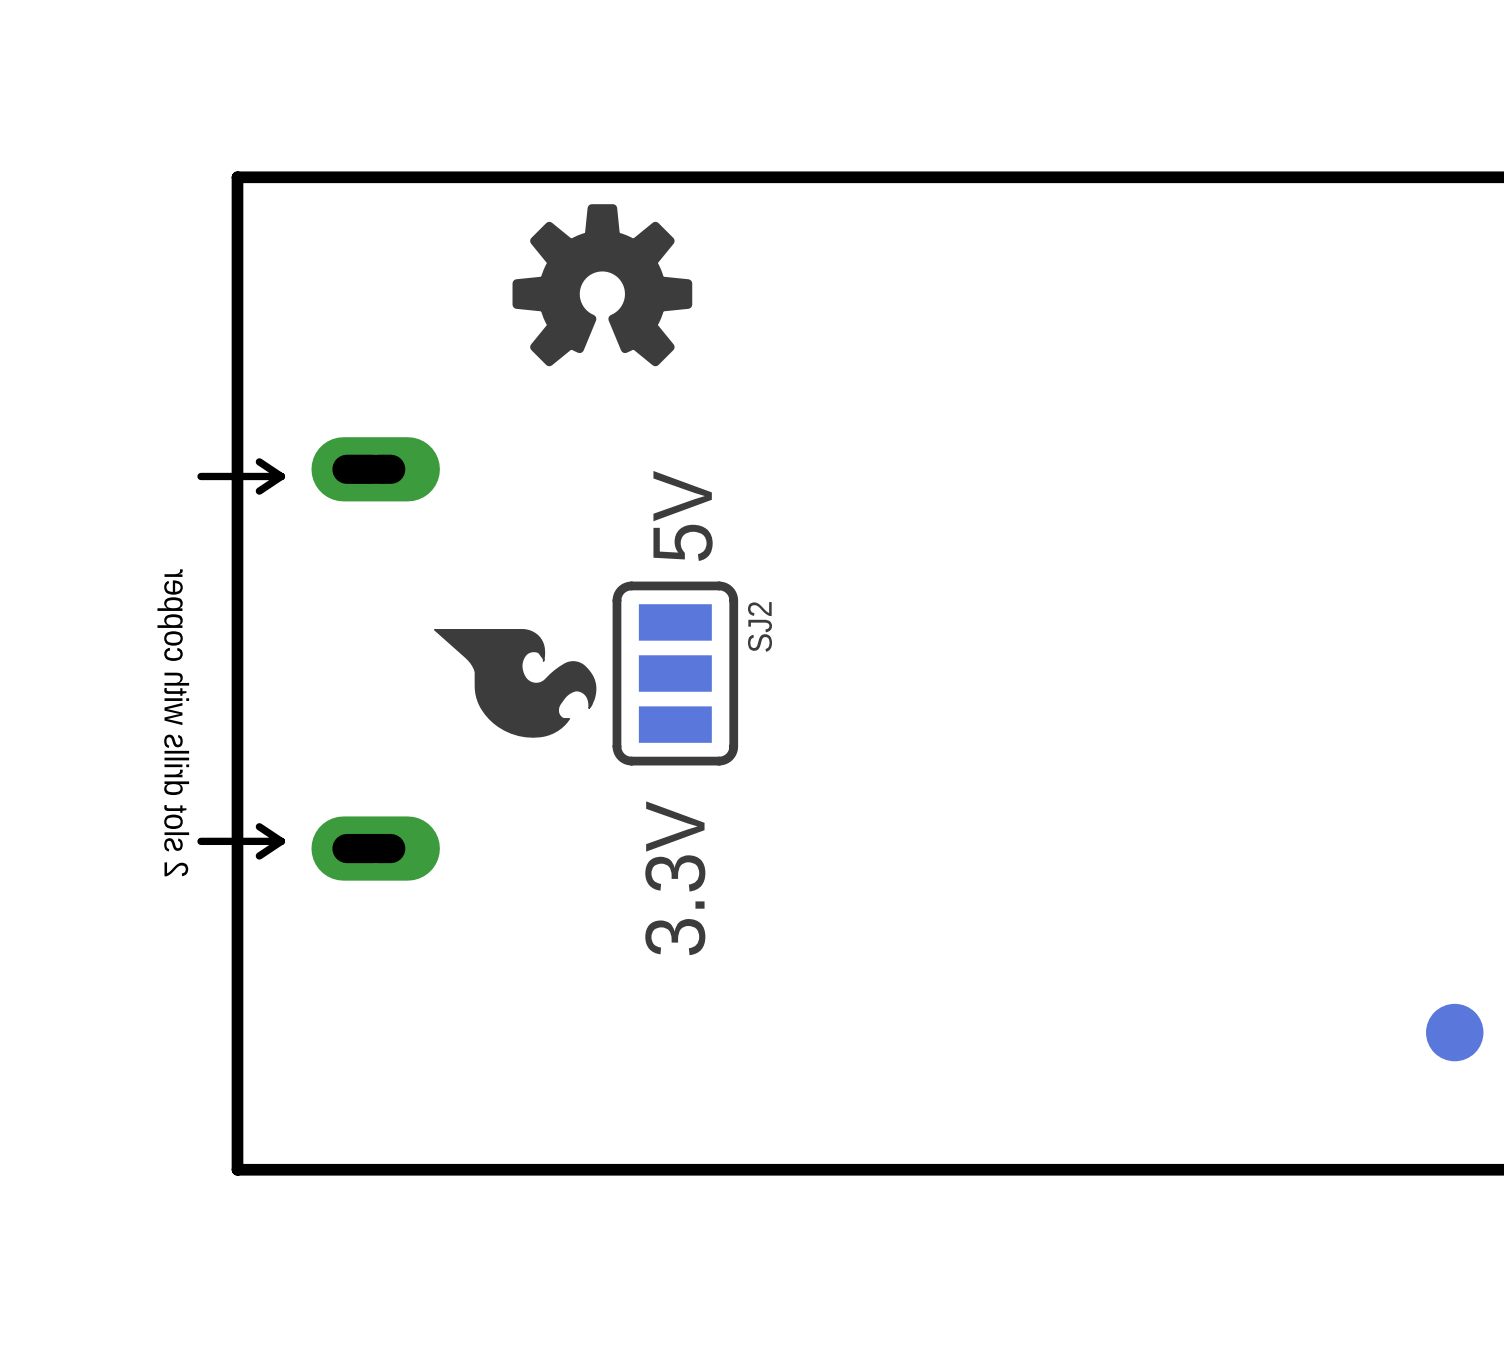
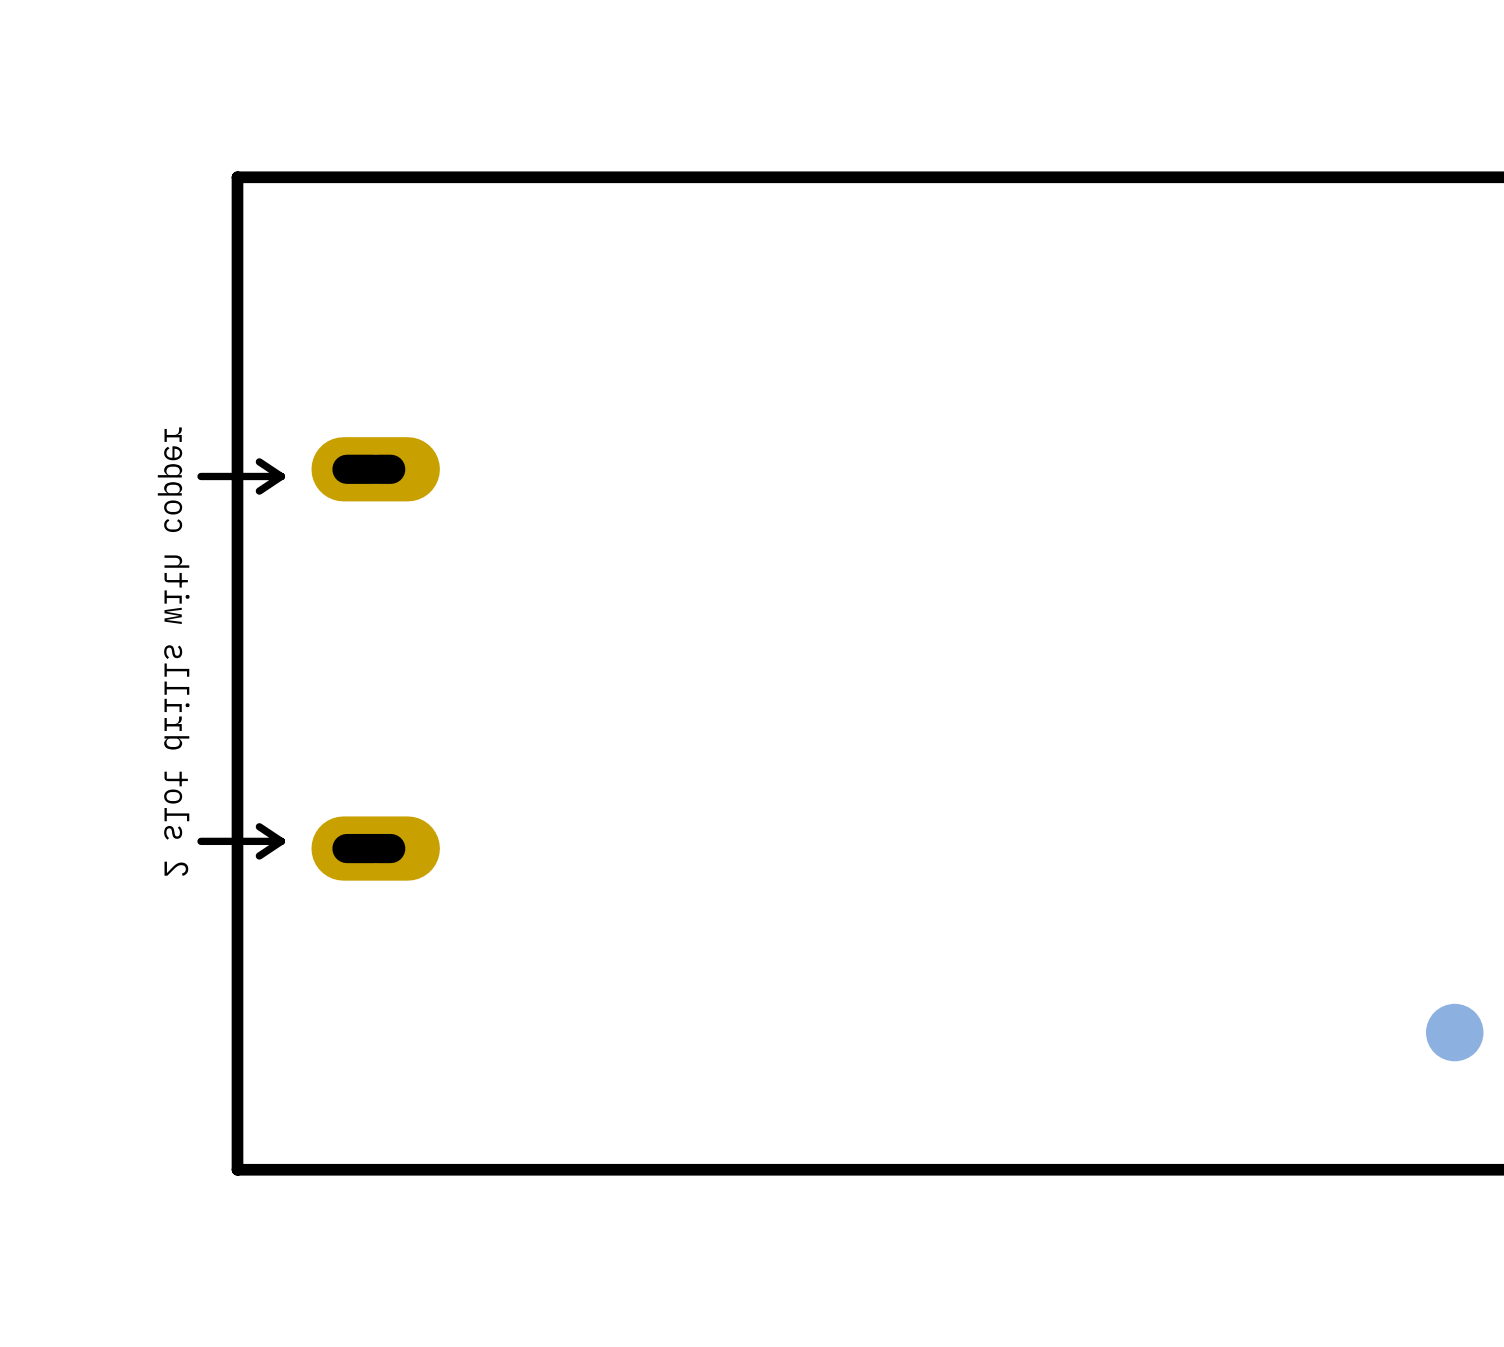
drawing: [512, 204, 693, 367] -> none
text: 5V (683, 515) -> none
drawing: [433, 629, 597, 738] -> none
SJ2: (675, 673) -> none
text: 3.3V (675, 878) -> none

